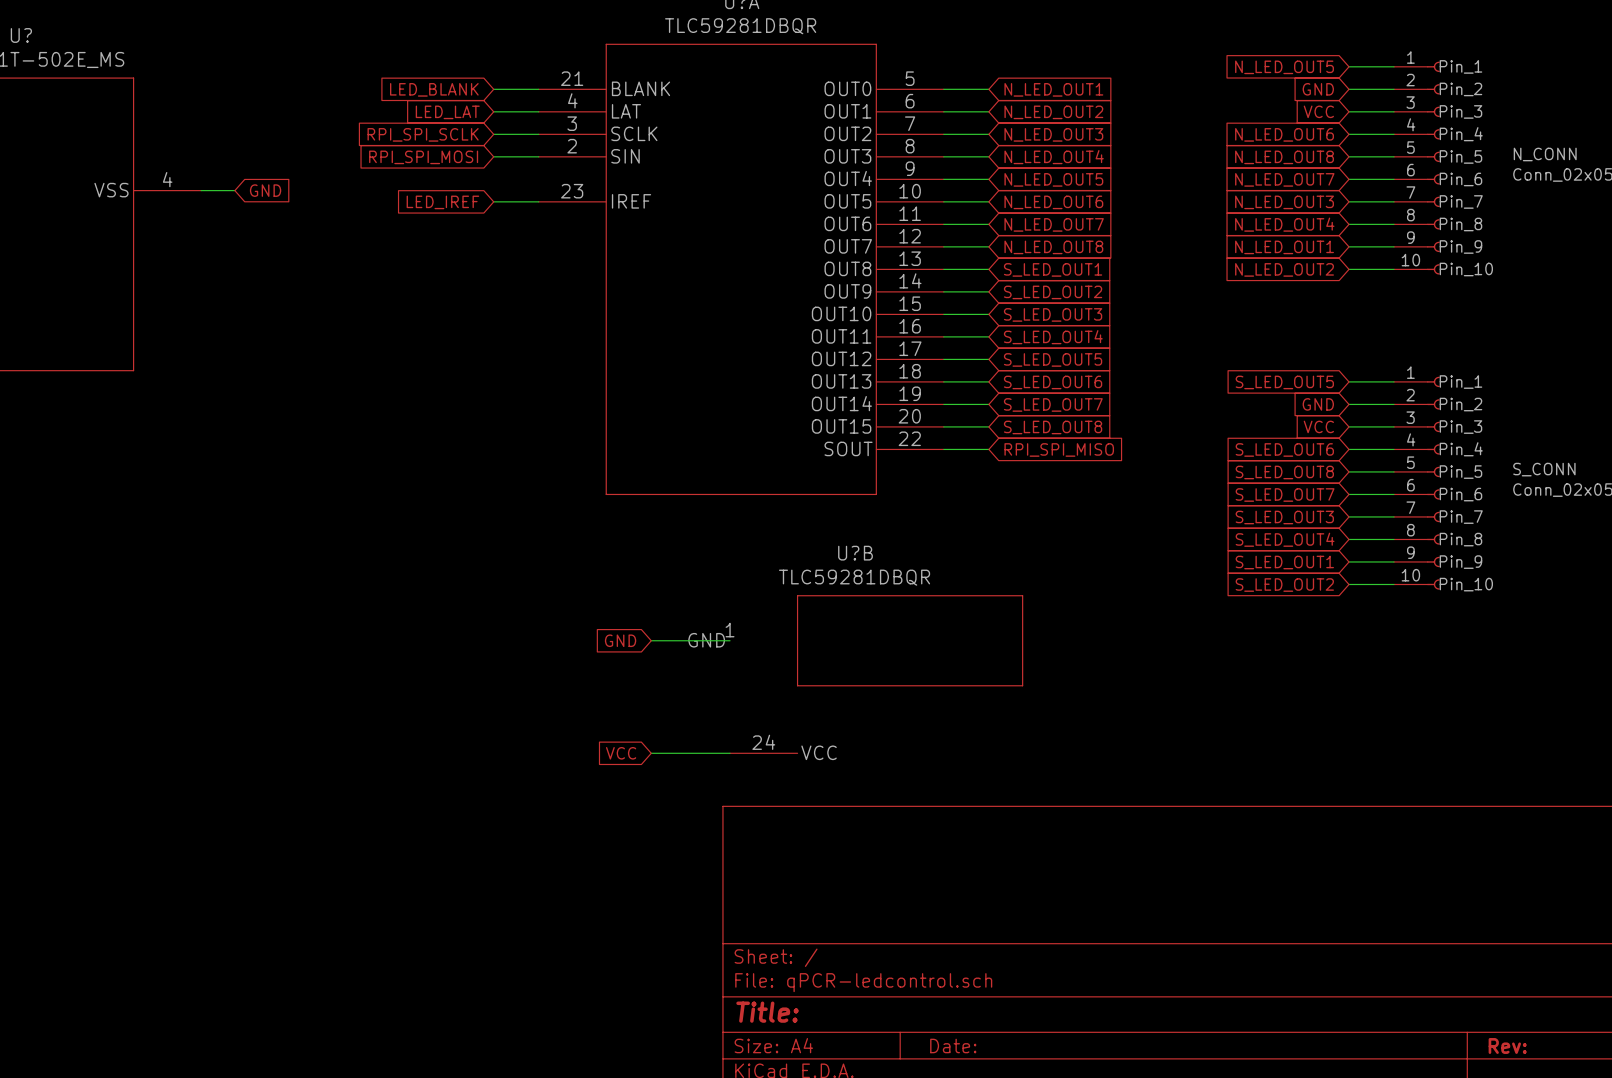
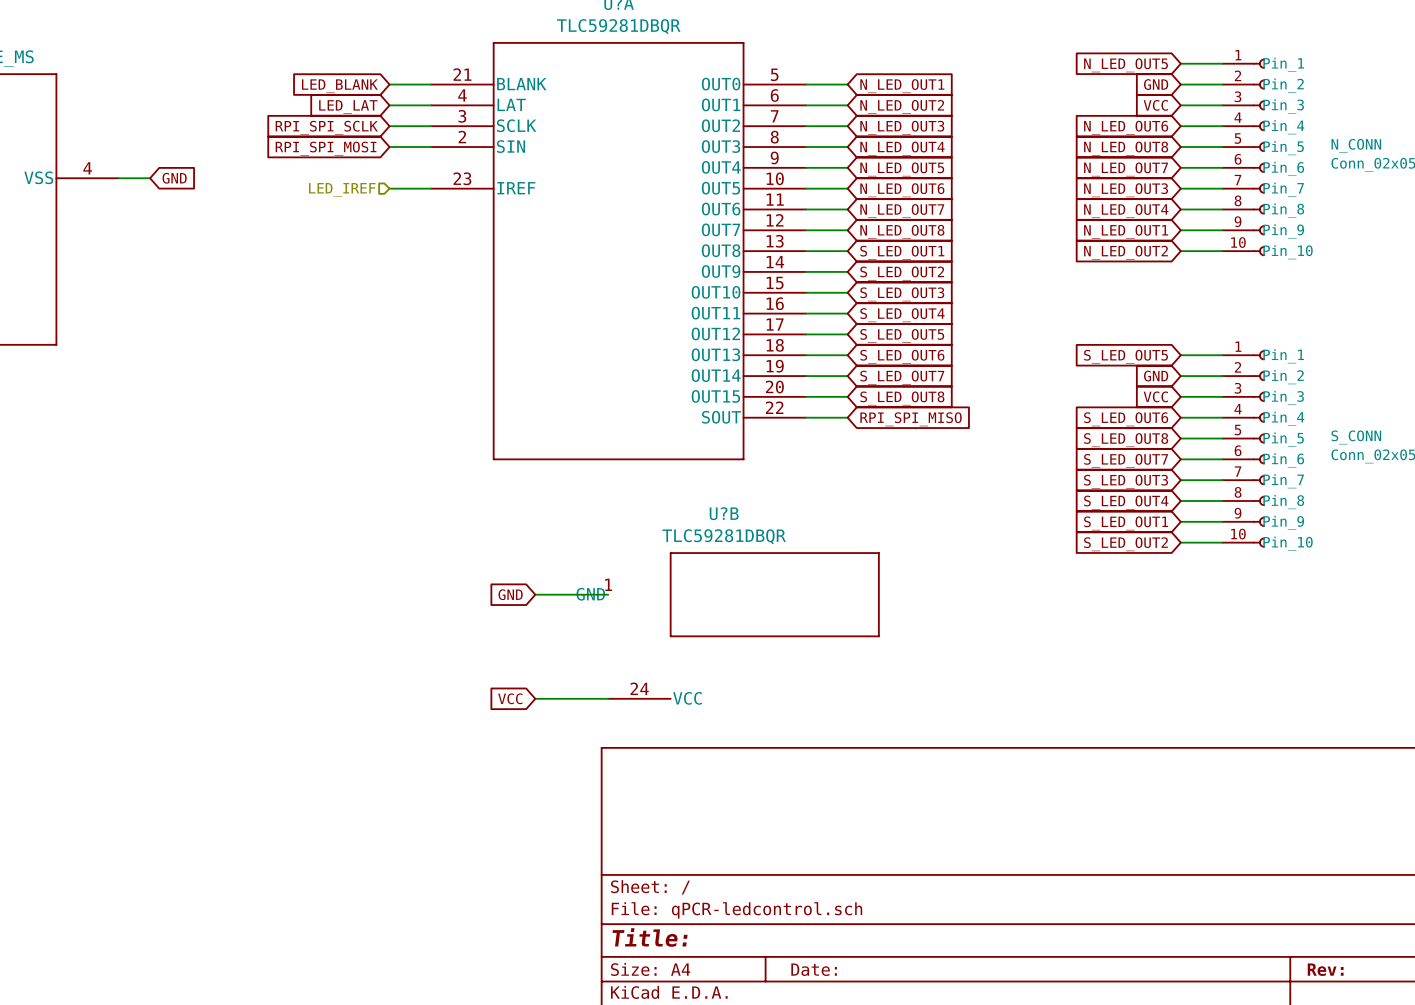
hierarchical label: none -> LED_IREF (342, 189)
global label: LED_IREF (442, 202) -> none

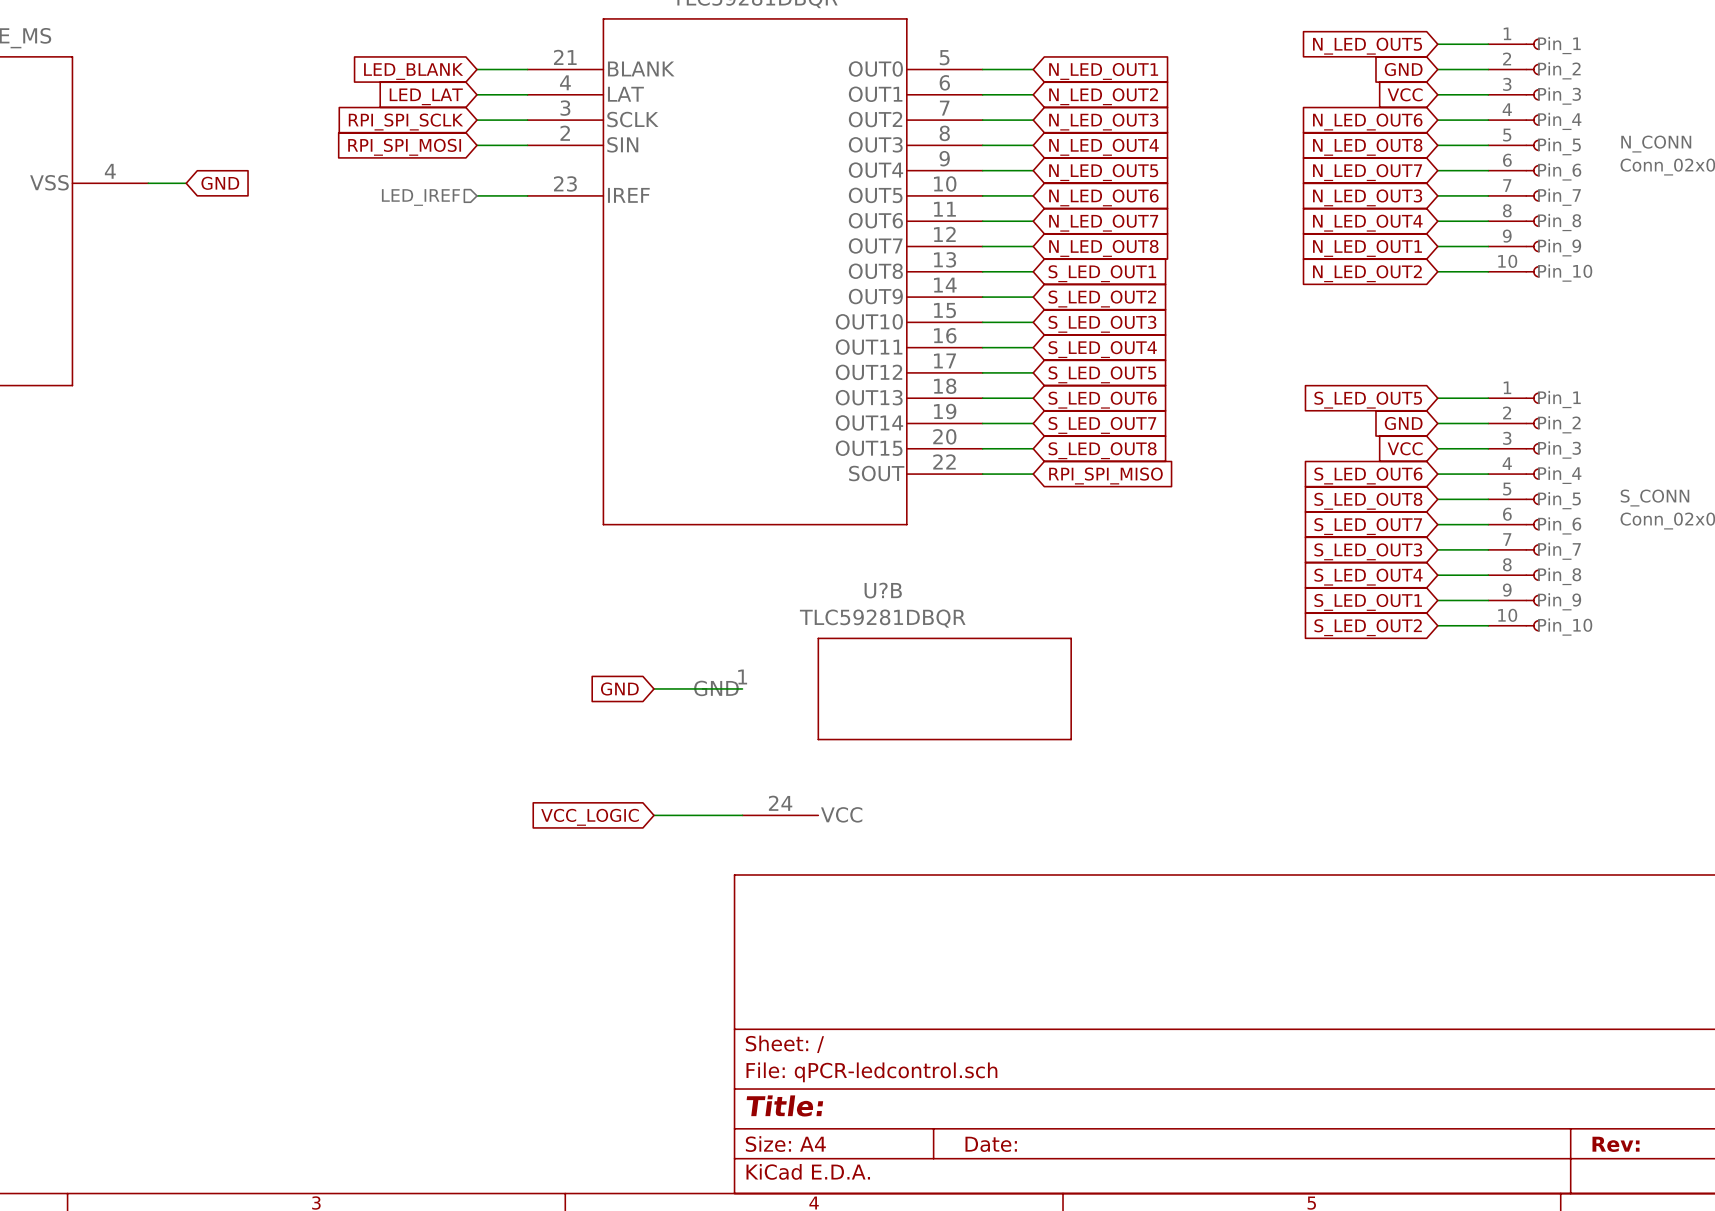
global label: VCC (510, 698) -> VCC_LOGIC (590, 817)

